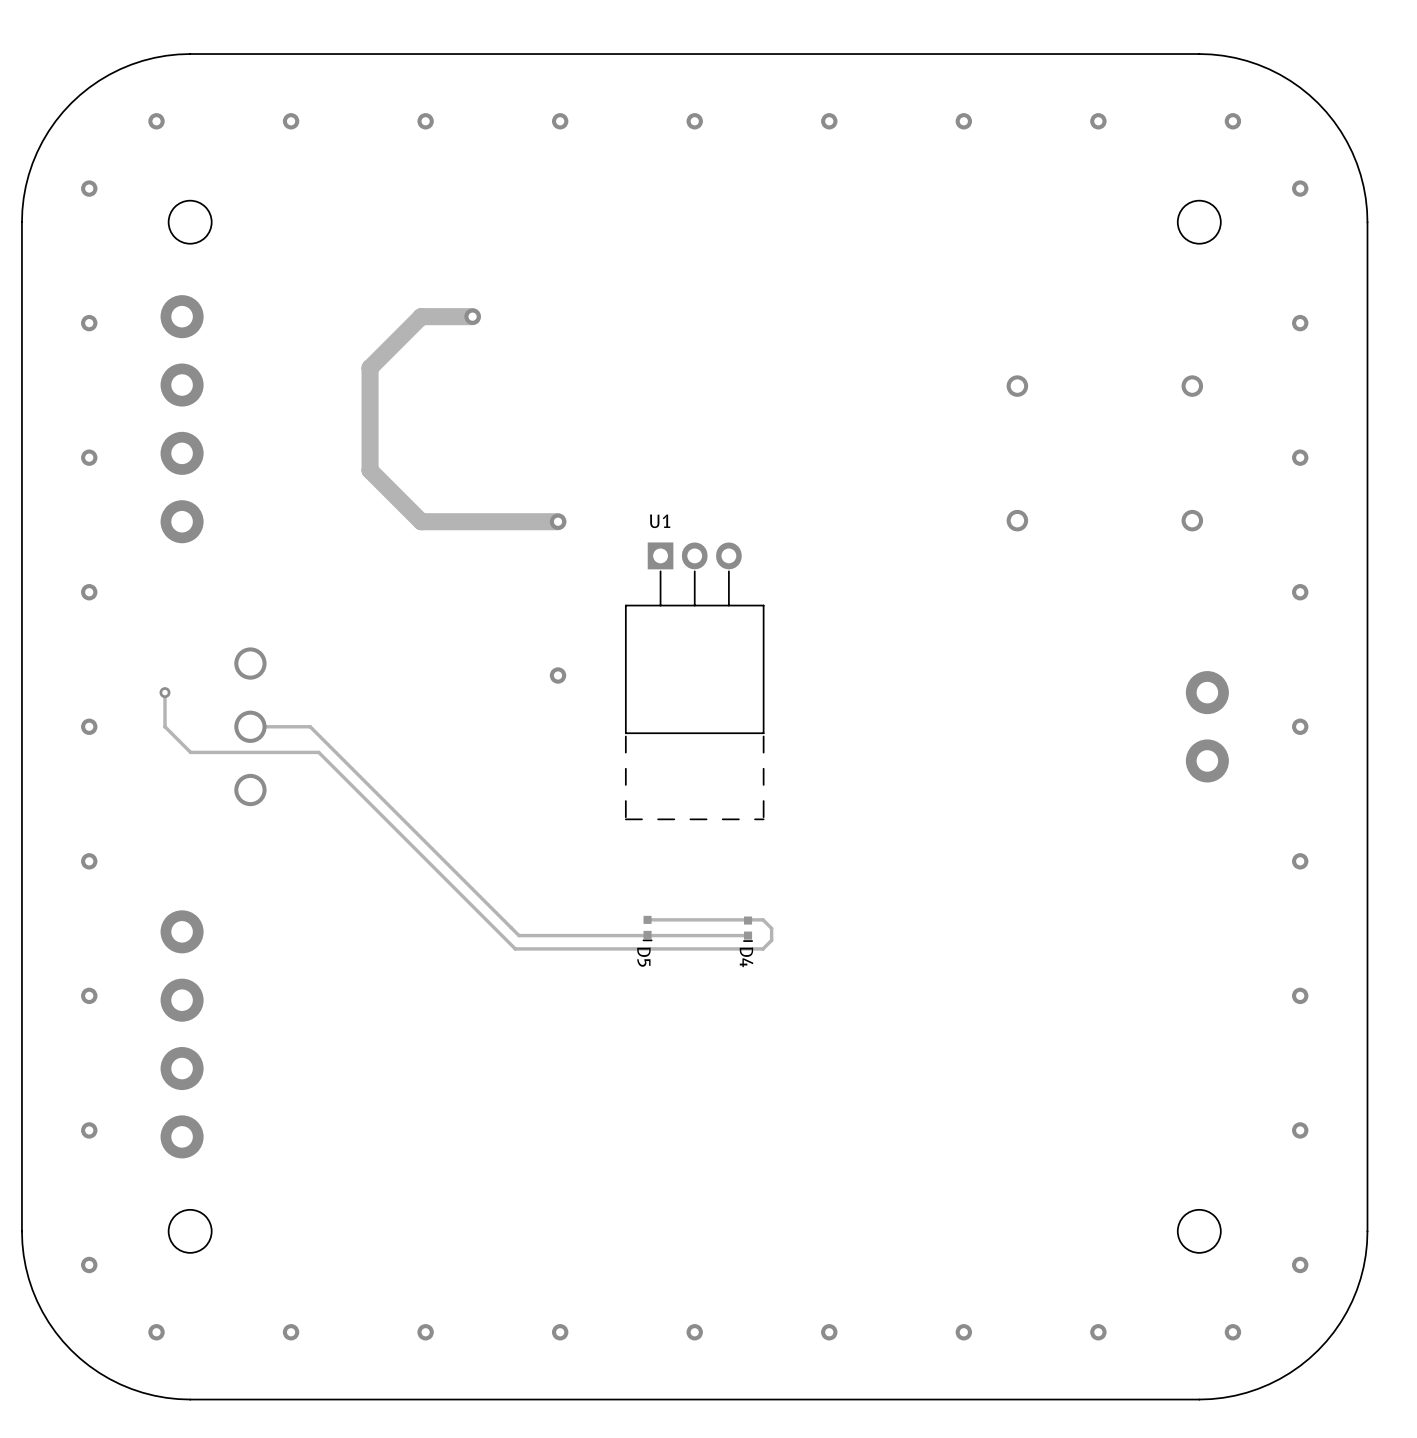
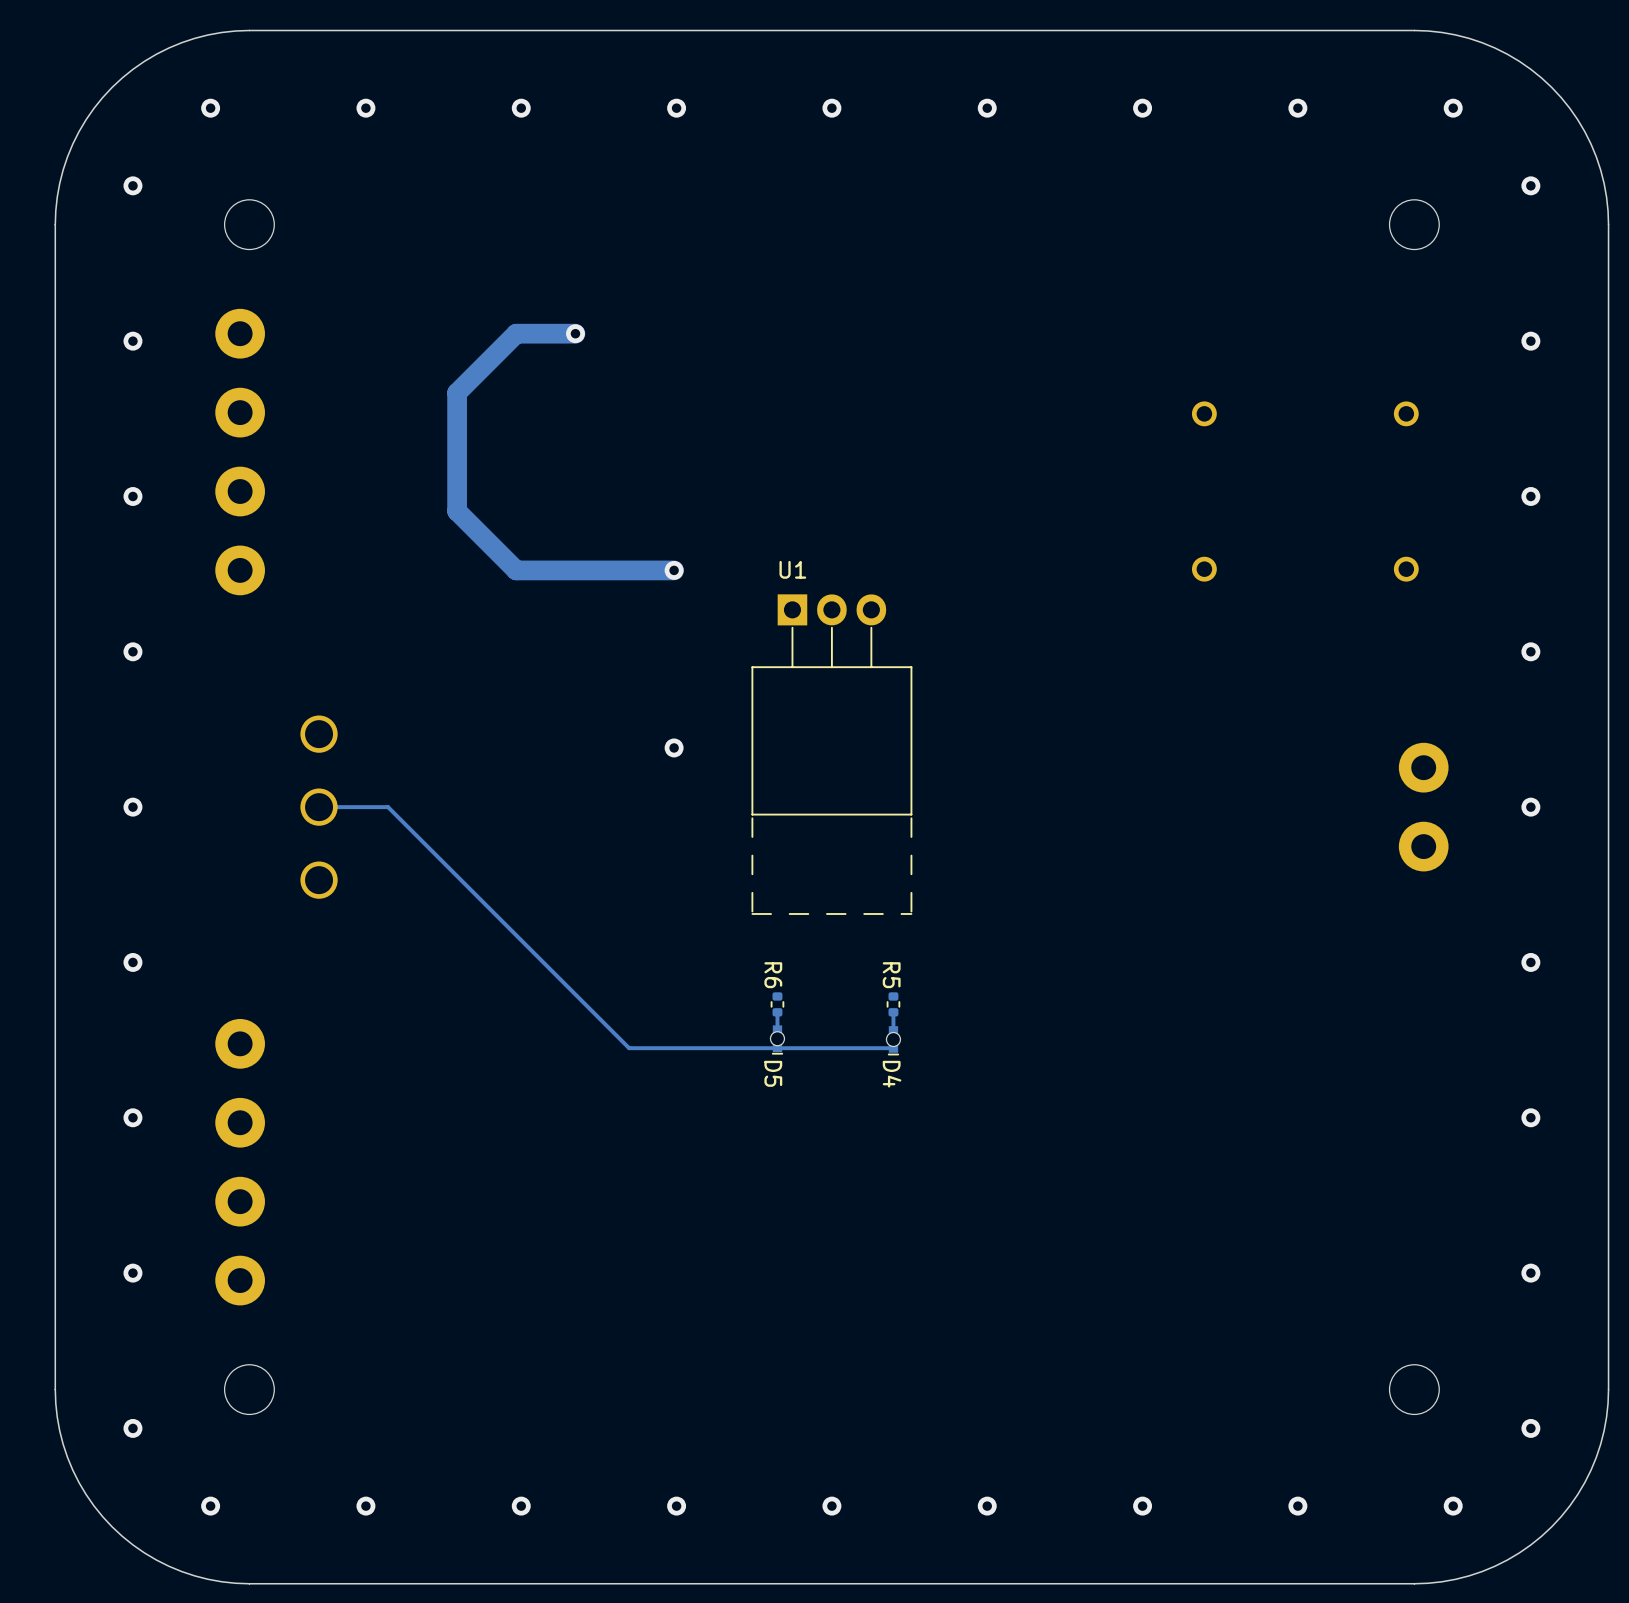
track: (164, 692) (164, 726) (190, 752) (318, 752) (515, 948) (763, 948) (771, 940) (771, 928) (763, 919) (647, 919) -> none
via: (164, 692) -> none
R6: none -> (777, 1004)
R5: none -> (893, 1004)
track: none -> (777, 1012) (777, 1025)
track: none -> (893, 1012) (893, 1026)
D5 footprint: [642, 915, 653, 942] -> [770, 1025, 785, 1055]
D4 footprint: [743, 916, 753, 942] -> [886, 1026, 901, 1056]

